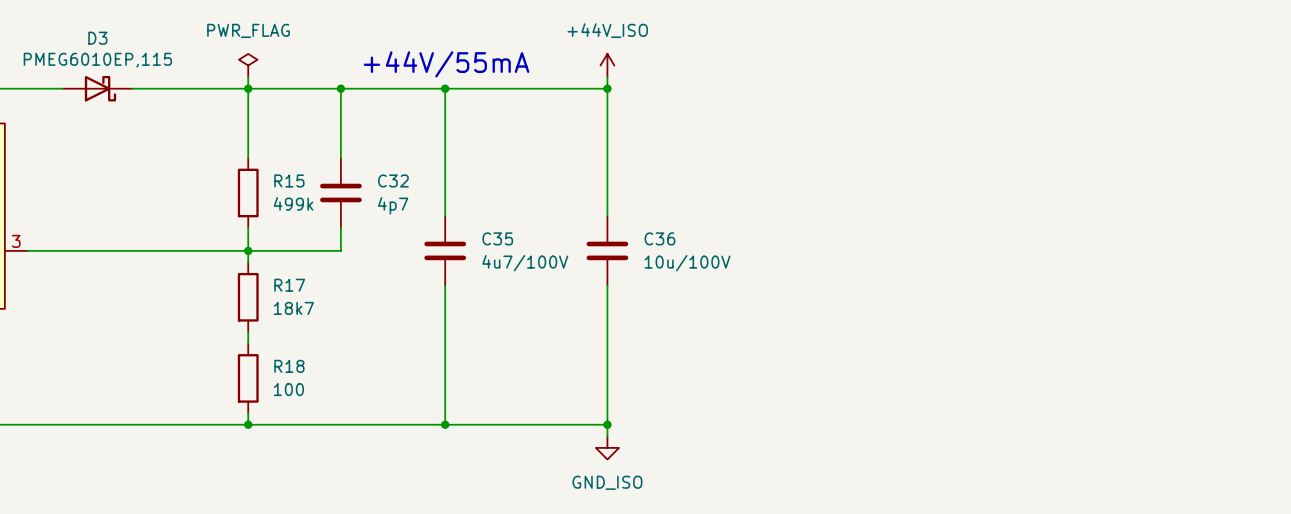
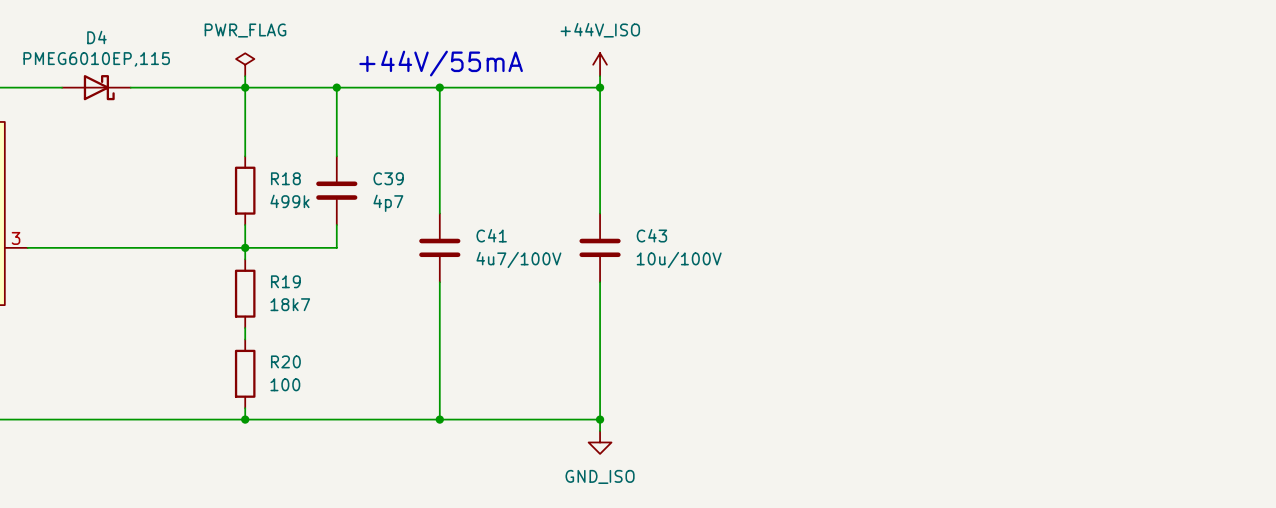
D3 name: D3 (97, 38) -> D4 (96, 37)
R15 name: R15 (289, 180) -> R18 (285, 178)
C32 name: C32 (393, 180) -> C39 (388, 178)
C35 name: C35 (497, 238) -> C41 (491, 235)
C36 name: C36 (659, 238) -> C43 (651, 235)
R17 name: R17 (289, 285) -> R19 (285, 281)
R18 name: R18 (289, 366) -> R20 (285, 361)

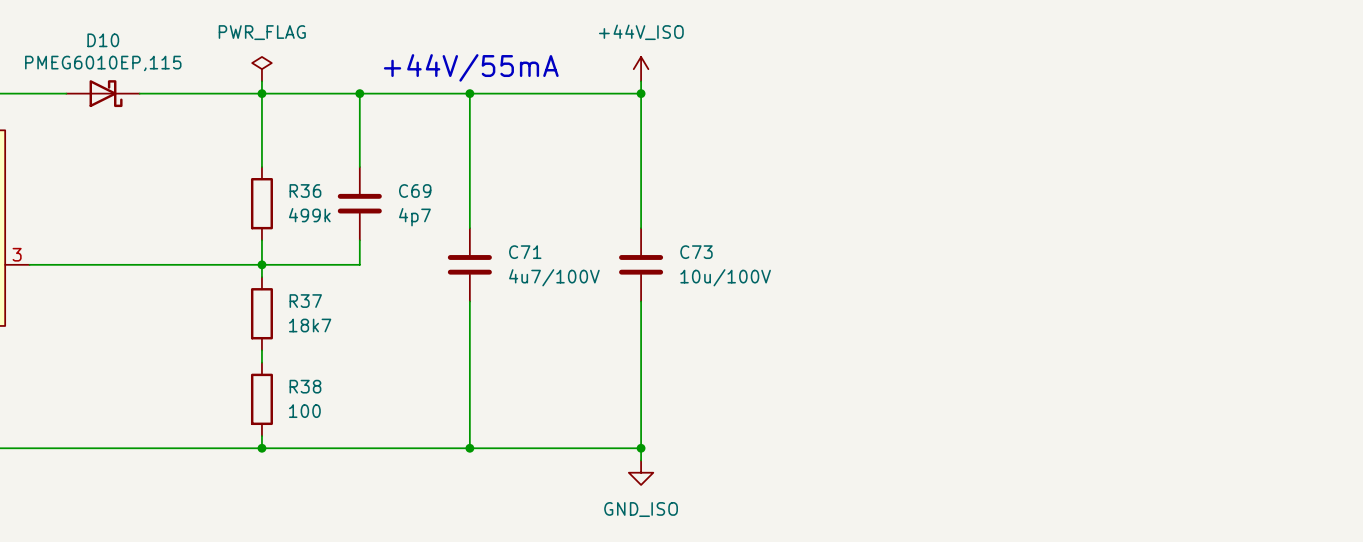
D4 name: D4 (96, 37) -> D10 (103, 40)
R18 name: R18 (285, 178) -> R36 (305, 190)
C39 name: C39 (388, 178) -> C69 (415, 190)
C41 name: C41 (491, 235) -> C71 (525, 252)
C43 name: C43 (651, 235) -> C73 (696, 252)
R19 name: R19 (285, 281) -> R37 (305, 301)
R20 name: R20 (285, 361) -> R38 (305, 386)

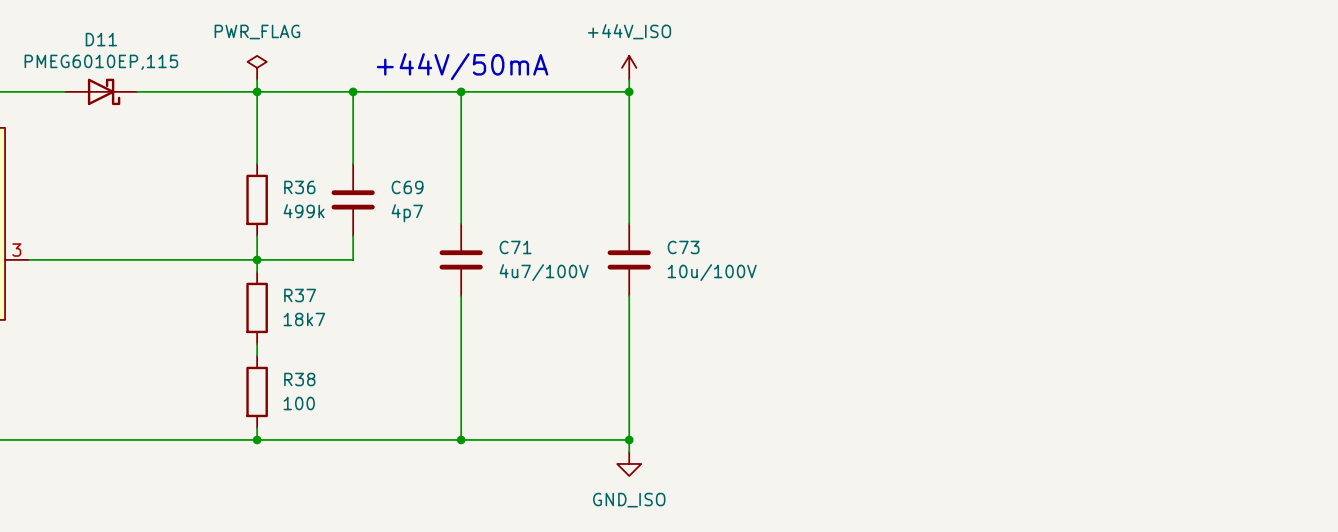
D10 name: D10 (103, 40) -> D11 (101, 39)
text: +44V/55mA (471, 67) -> +44V/50mA (462, 66)

